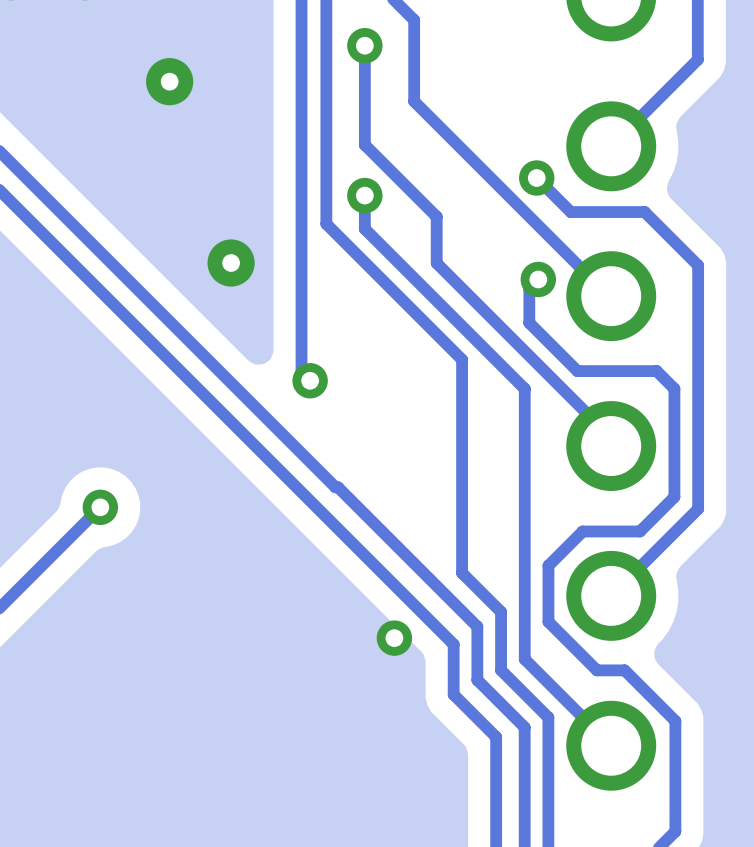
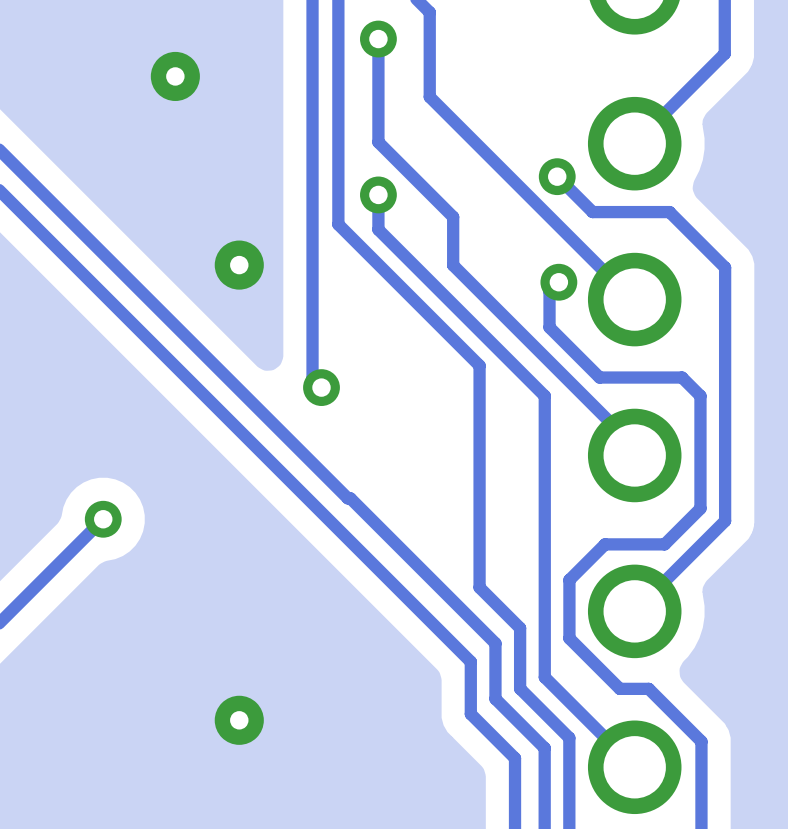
via: (394, 638) -> none
via: none -> (239, 720)

